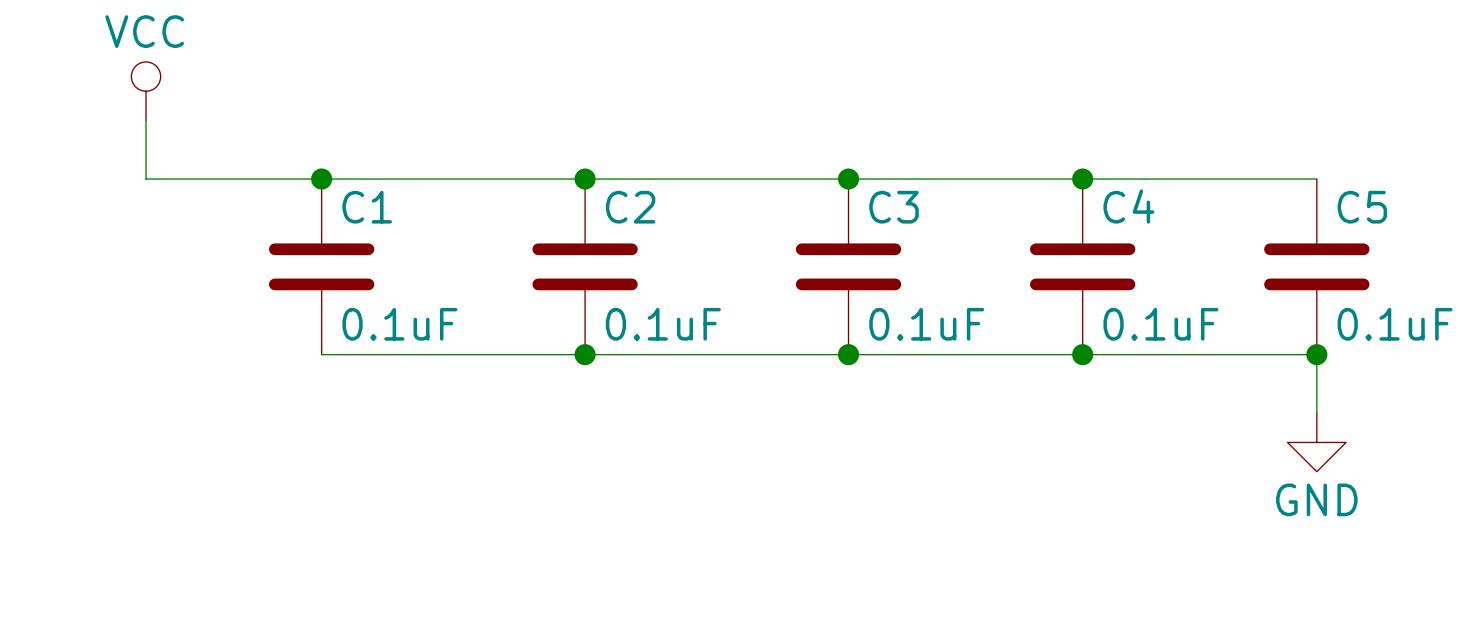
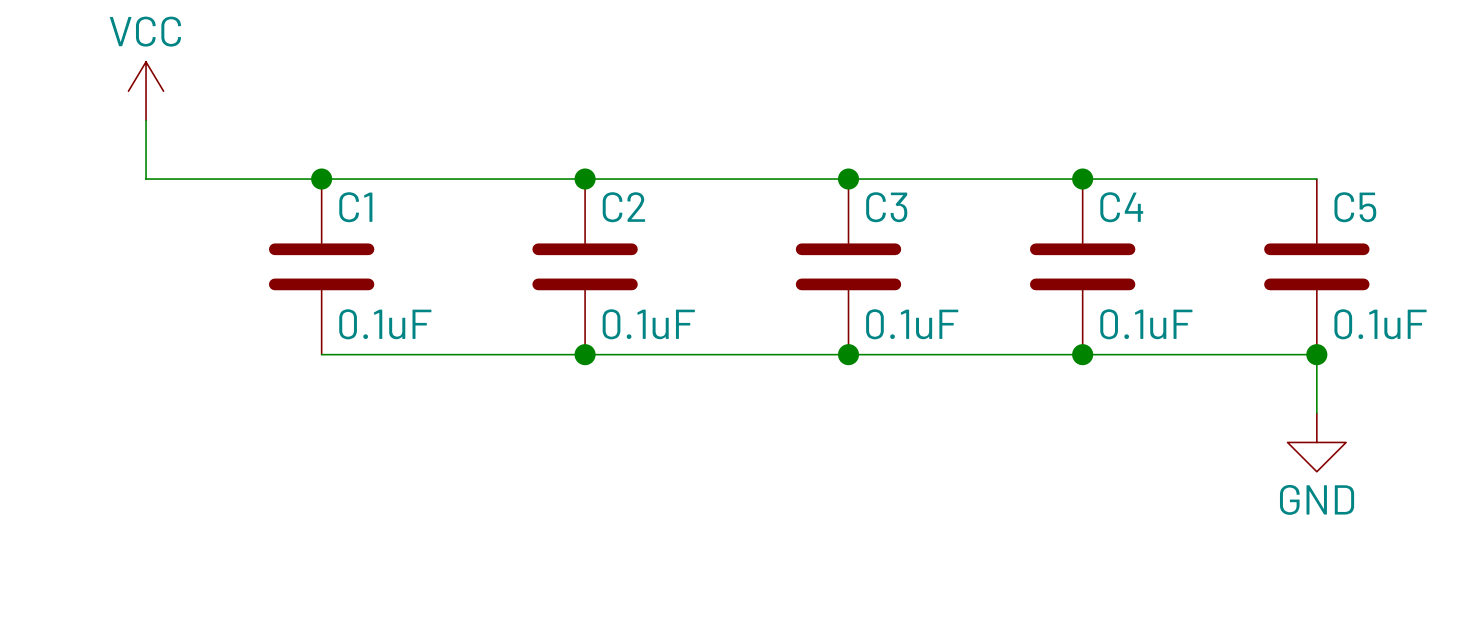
power symbol shape: [131, 61, 161, 121] -> [128, 61, 164, 121]

